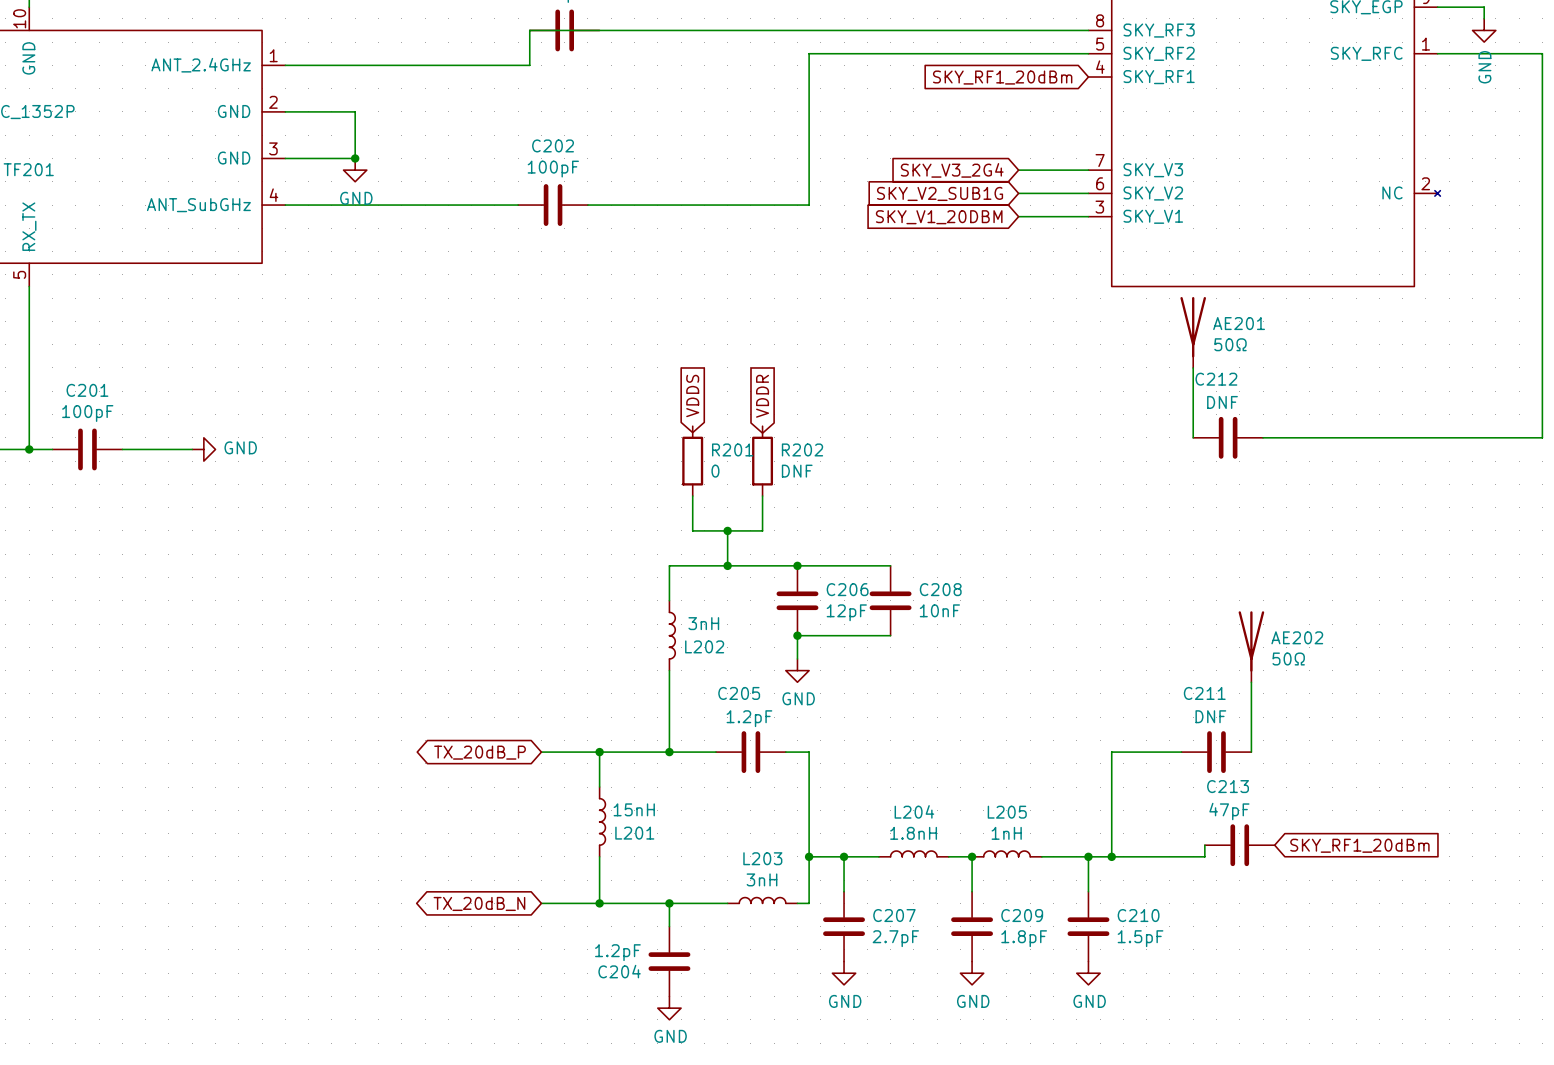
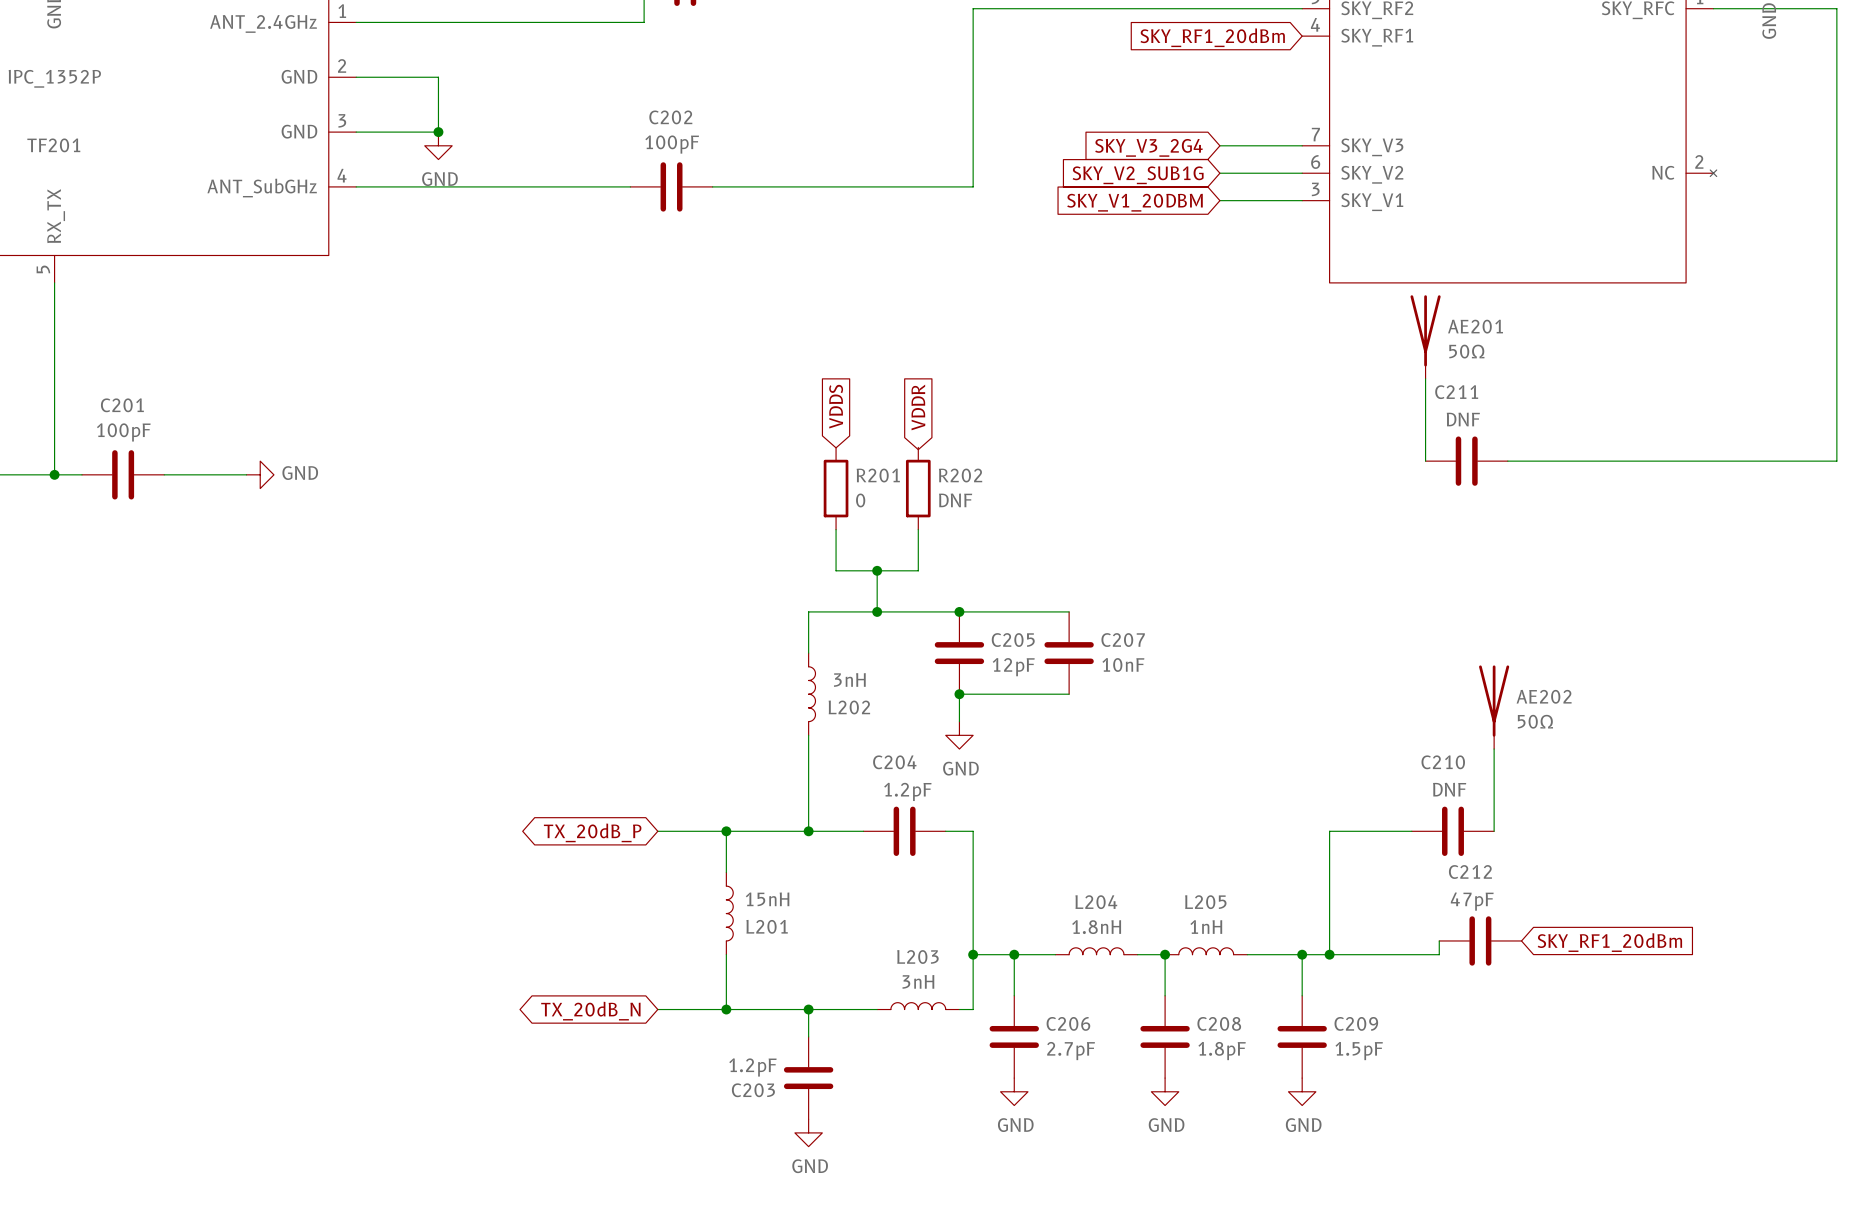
C212 name: C212 (1216, 379) -> C211 (1456, 392)
C206 name: C206 (847, 589) -> C205 (1013, 640)
C208 name: C208 (940, 589) -> C207 (1123, 640)
C205 name: C205 (739, 693) -> C204 (894, 762)
C211 name: C211 (1204, 693) -> C210 (1443, 762)
C213 name: C213 (1228, 786) -> C212 (1470, 871)
C207 name: C207 (894, 915) -> C206 (1068, 1023)
C209 name: C209 (1022, 915) -> C208 (1219, 1023)
C210 name: C210 (1138, 915) -> C209 (1356, 1023)
C204 name: C204 (619, 971) -> C203 (753, 1090)

